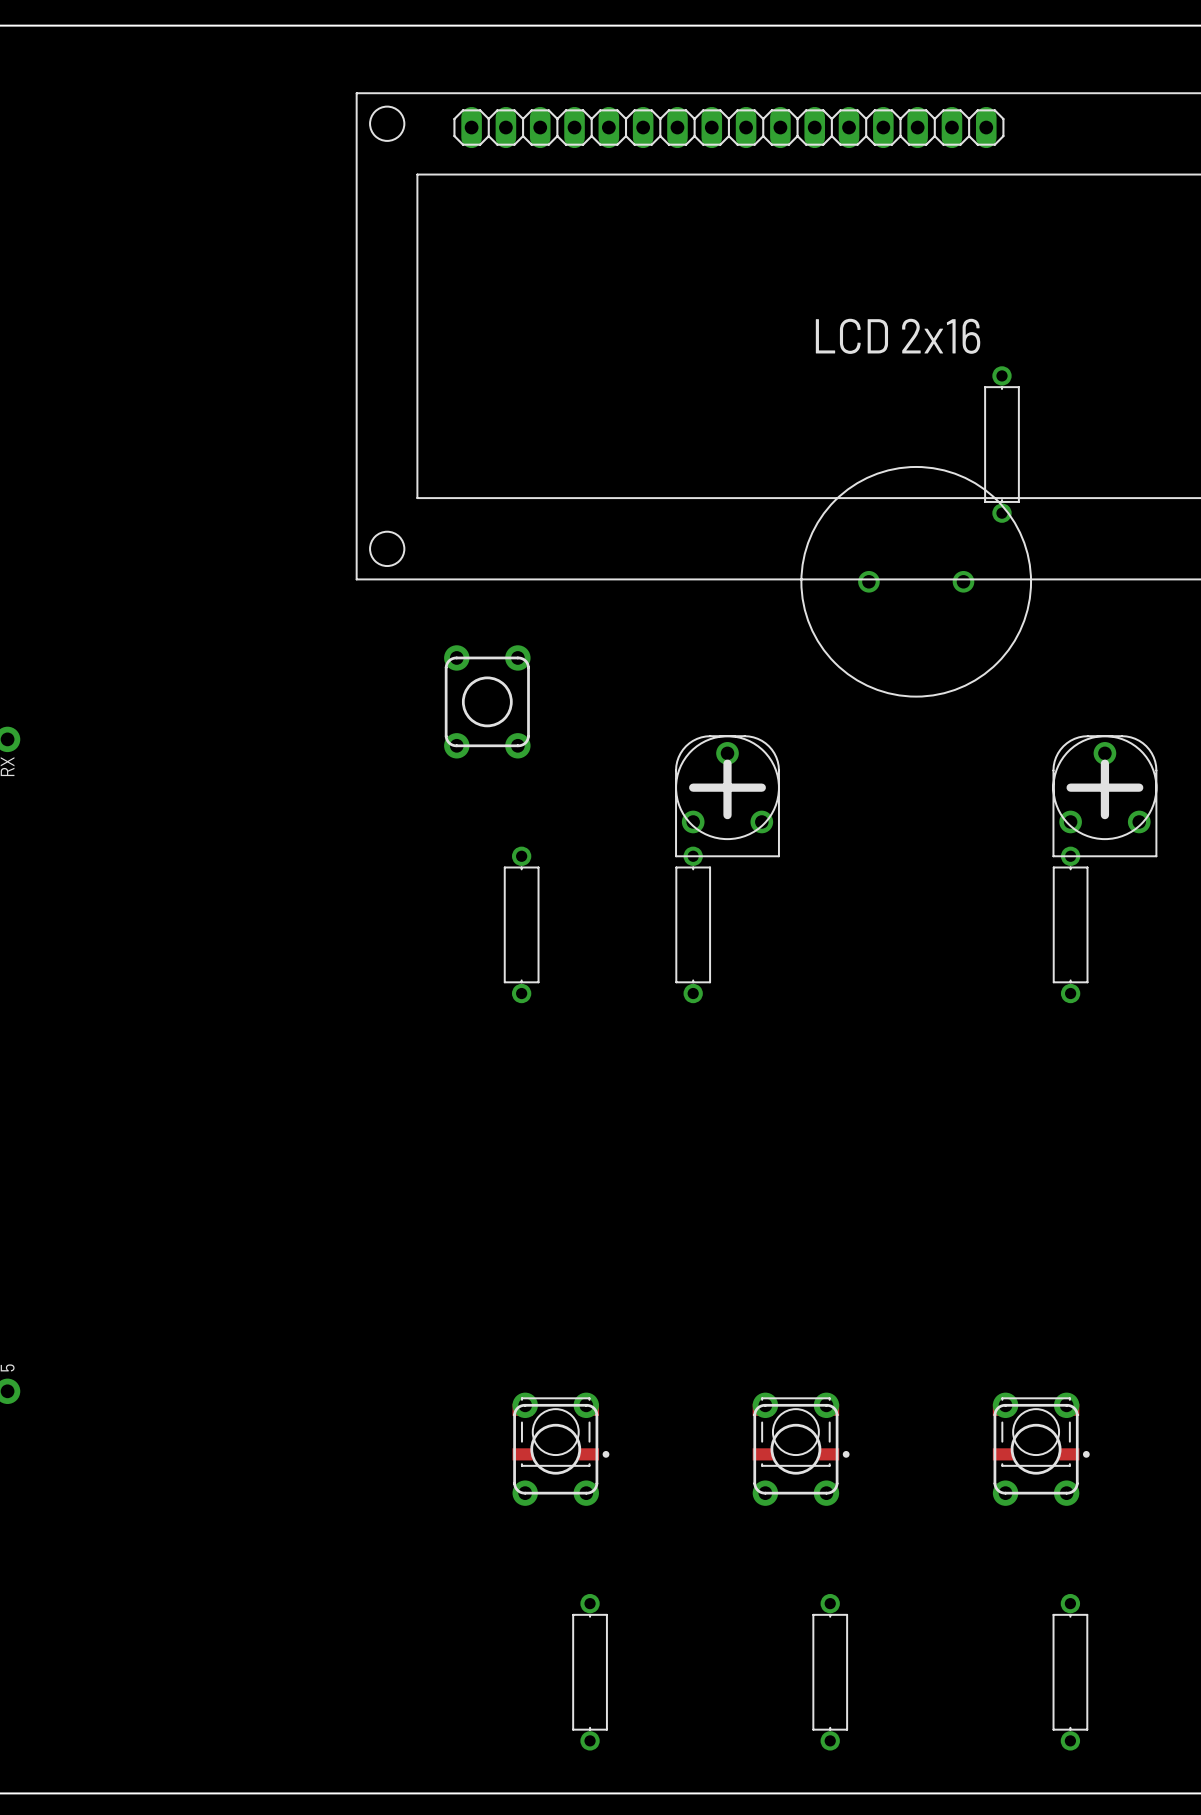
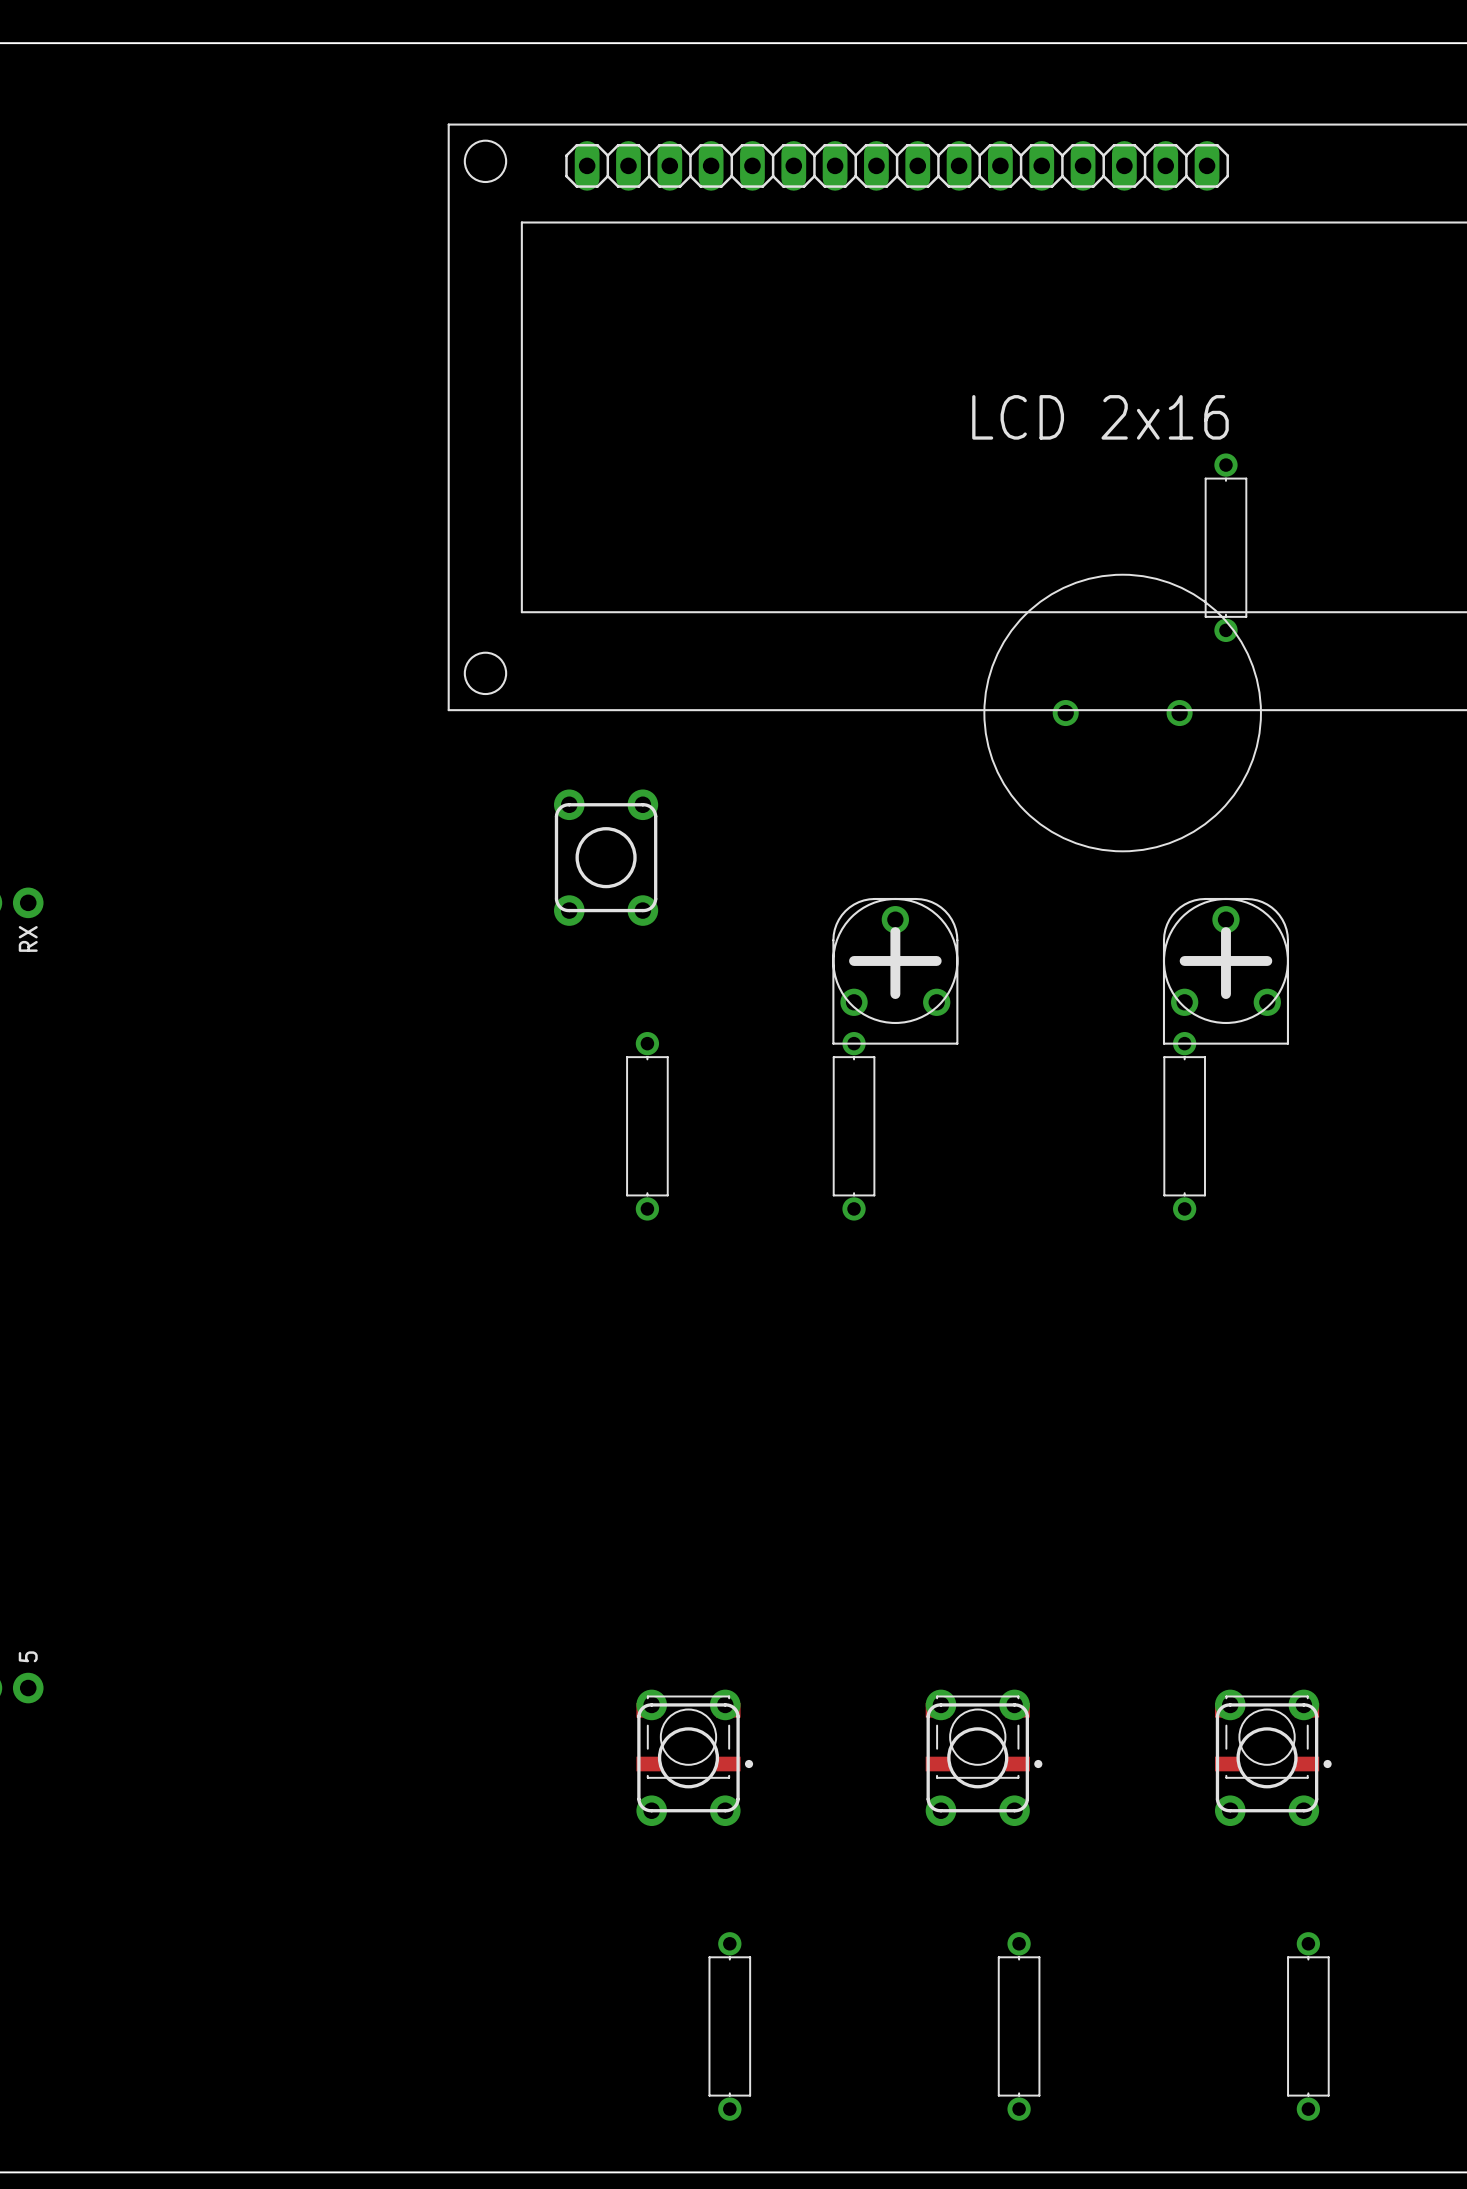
part: none -> (1225, 971)
part: (1104, 796) -> none
part: none -> (1184, 1126)
part: (1070, 924) -> none

